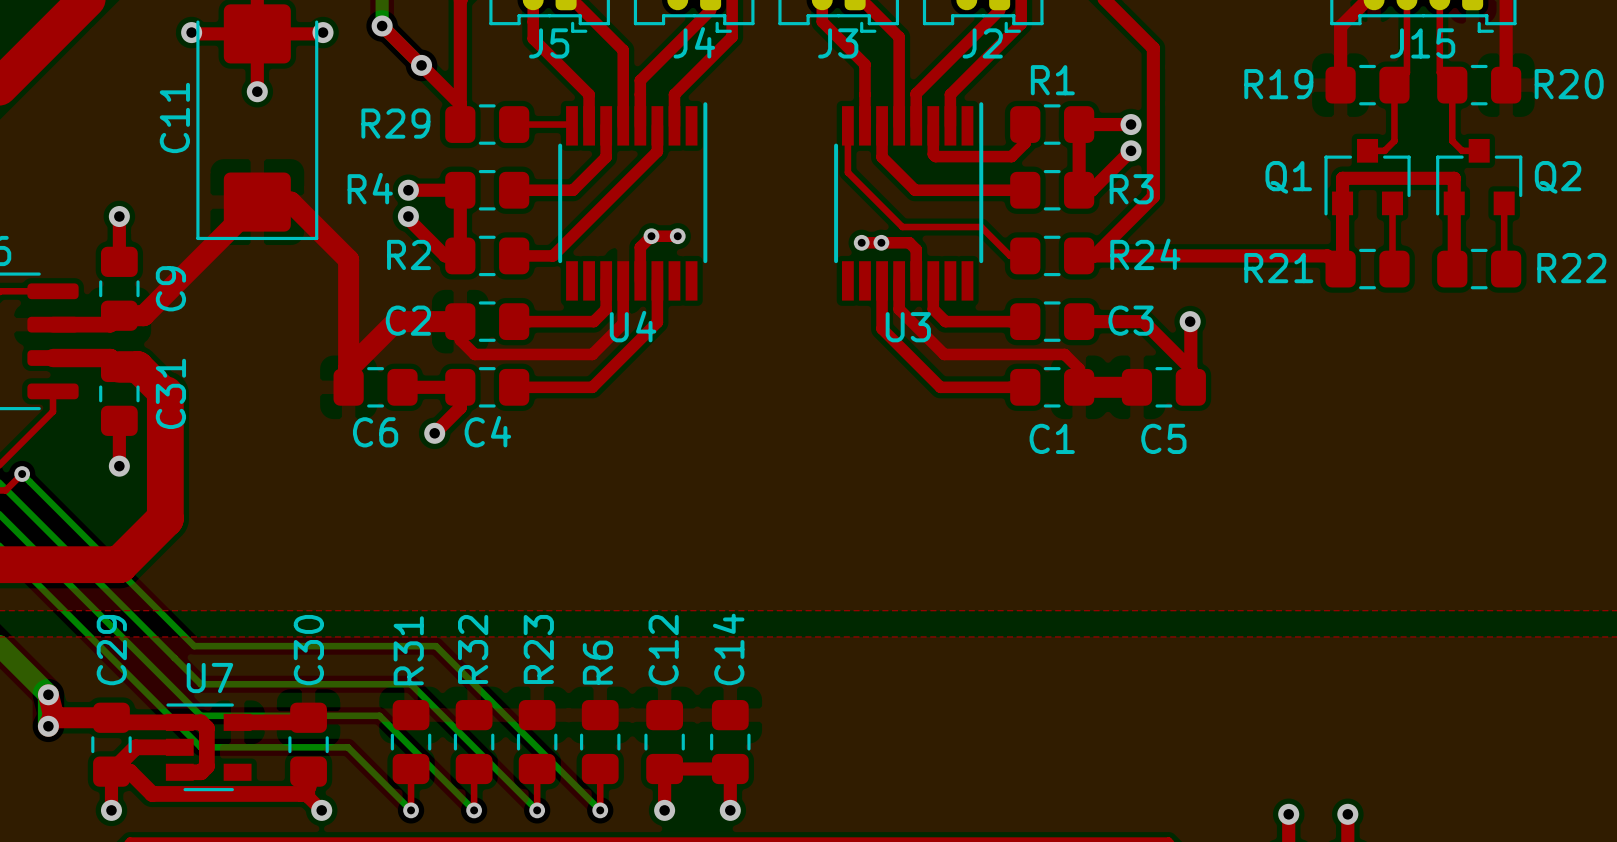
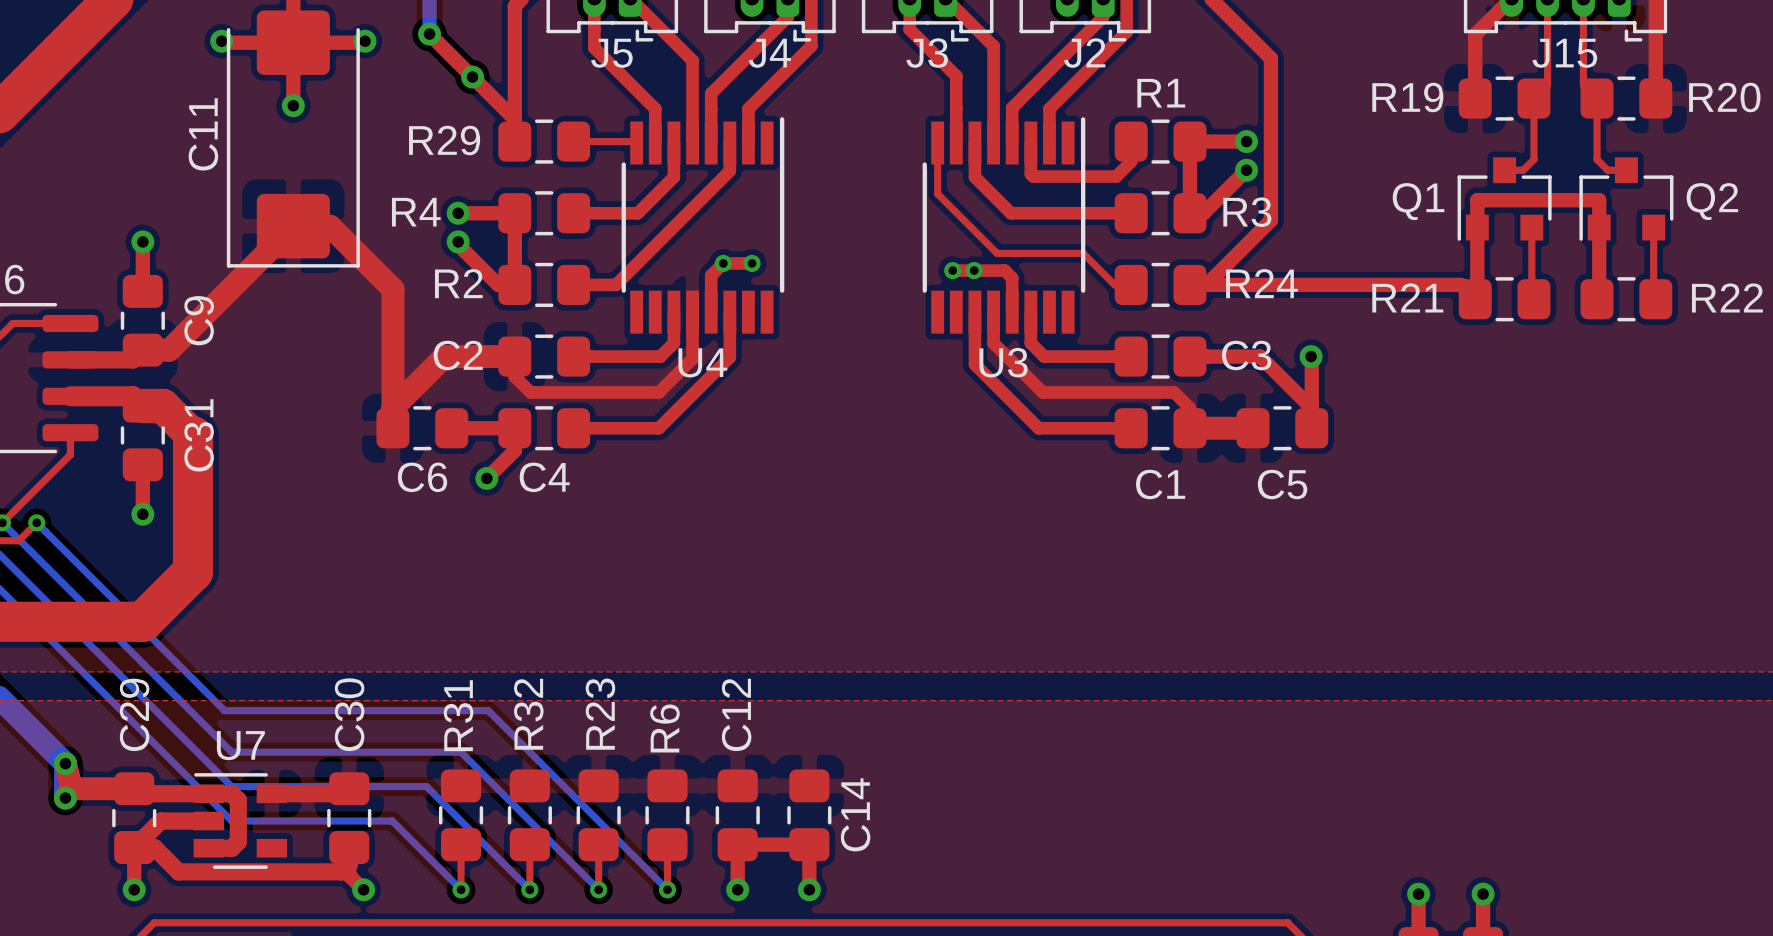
C14 name position: C14 (728, 649) -> C14 (855, 814)

